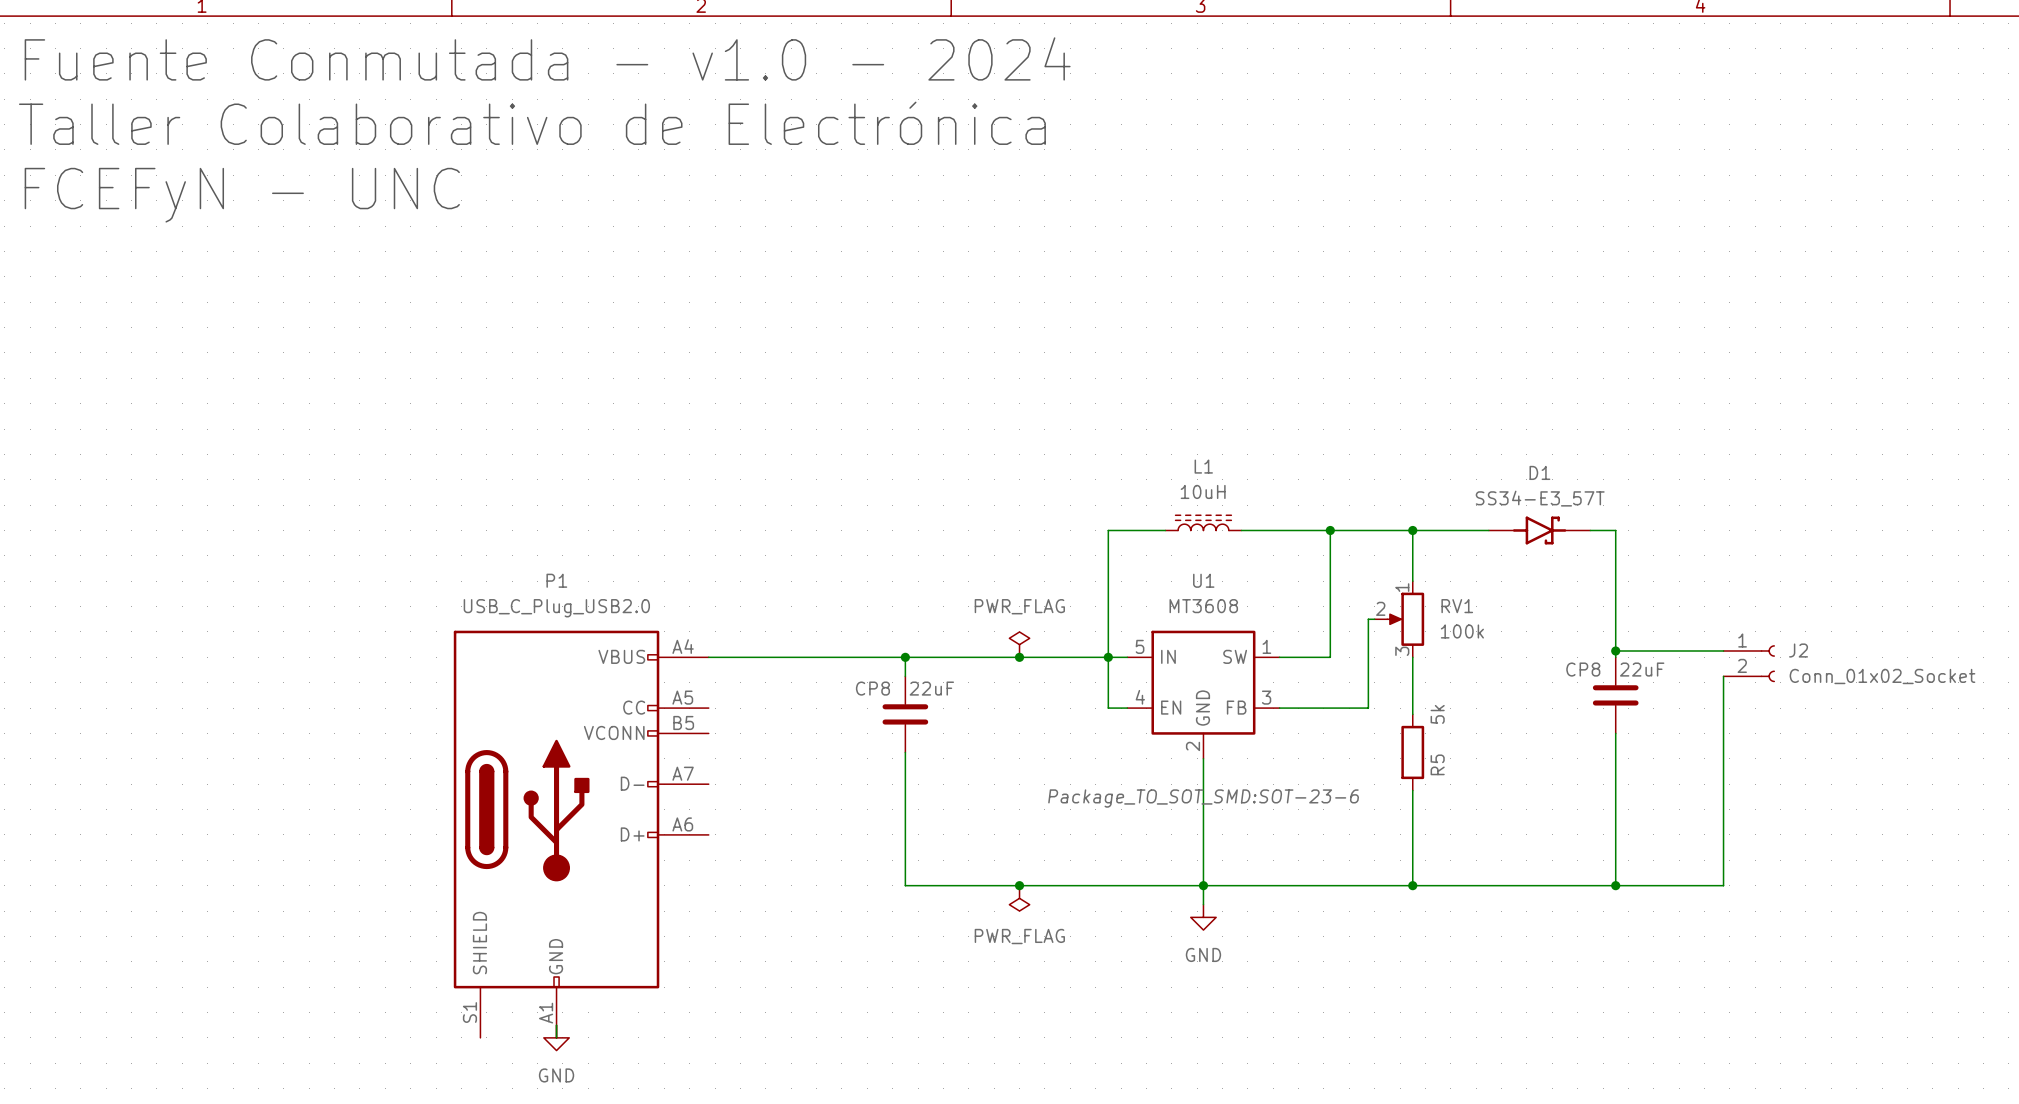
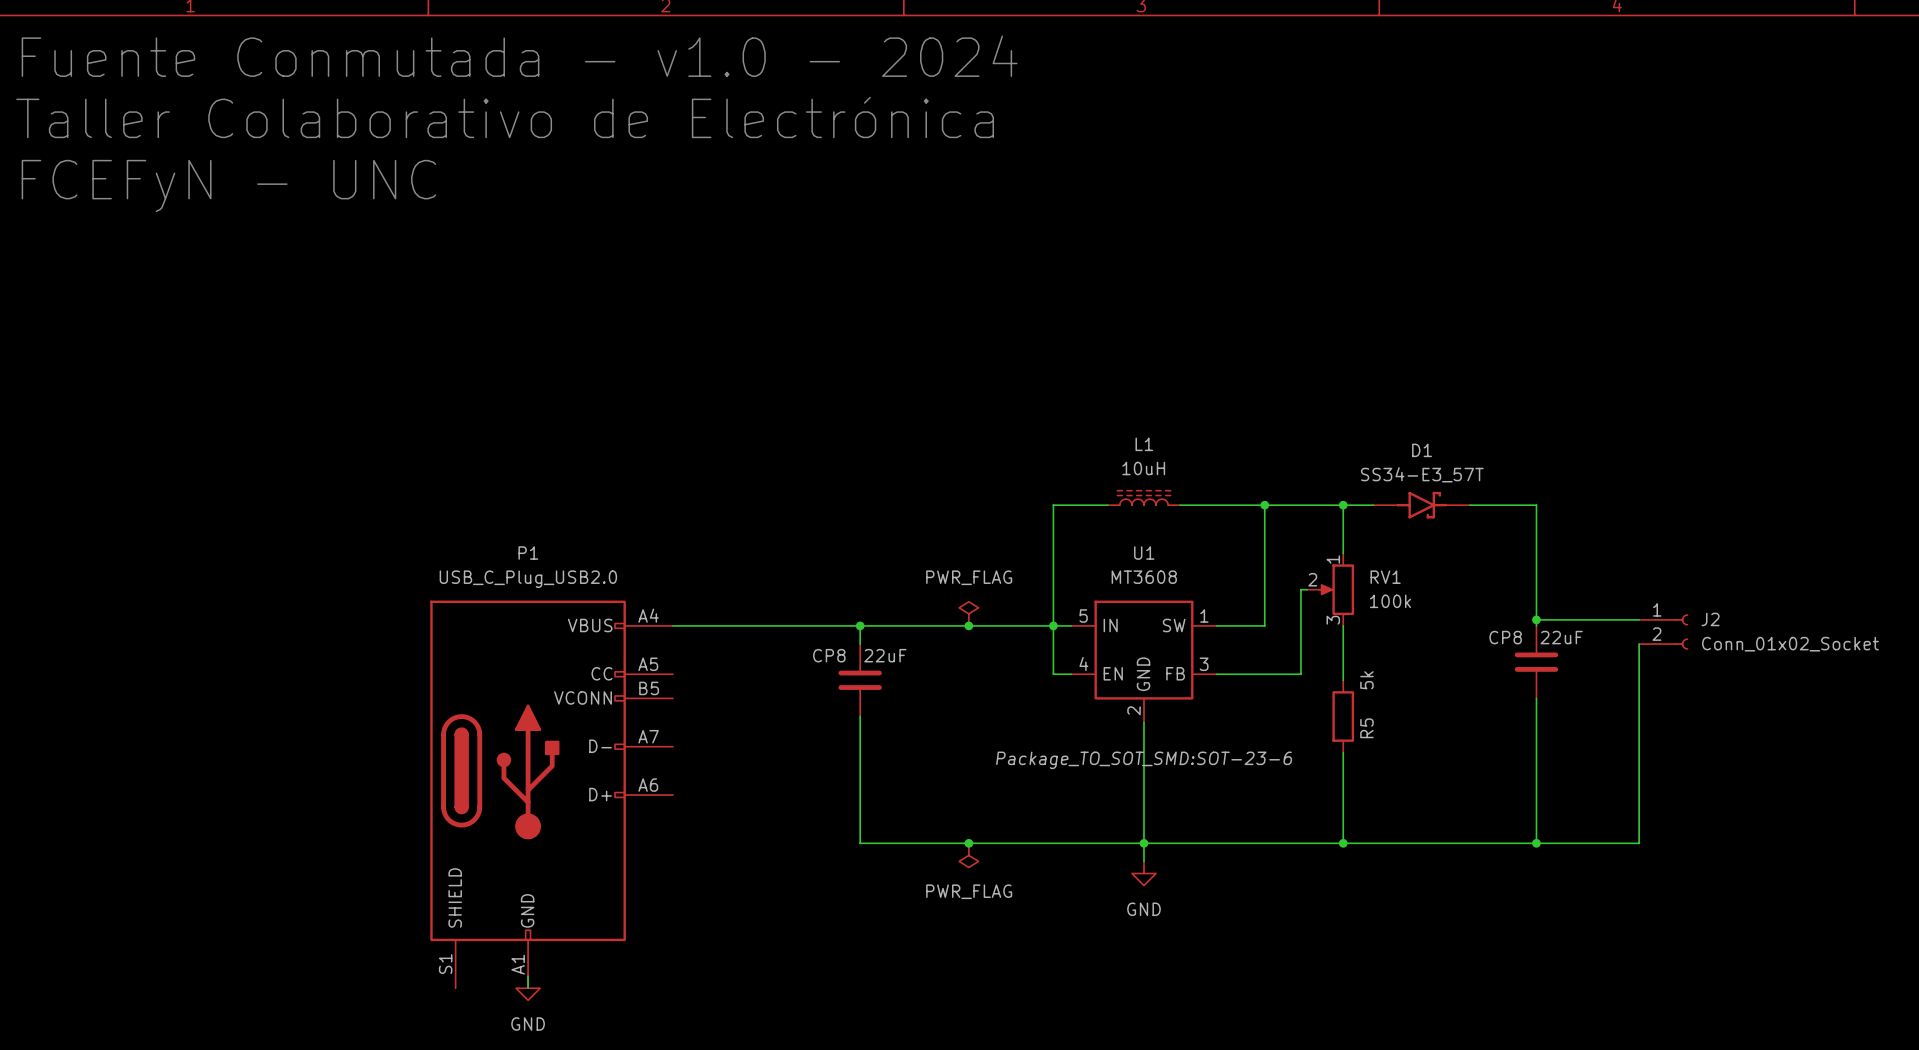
D1 position: (1539, 530) -> (1421, 505)

